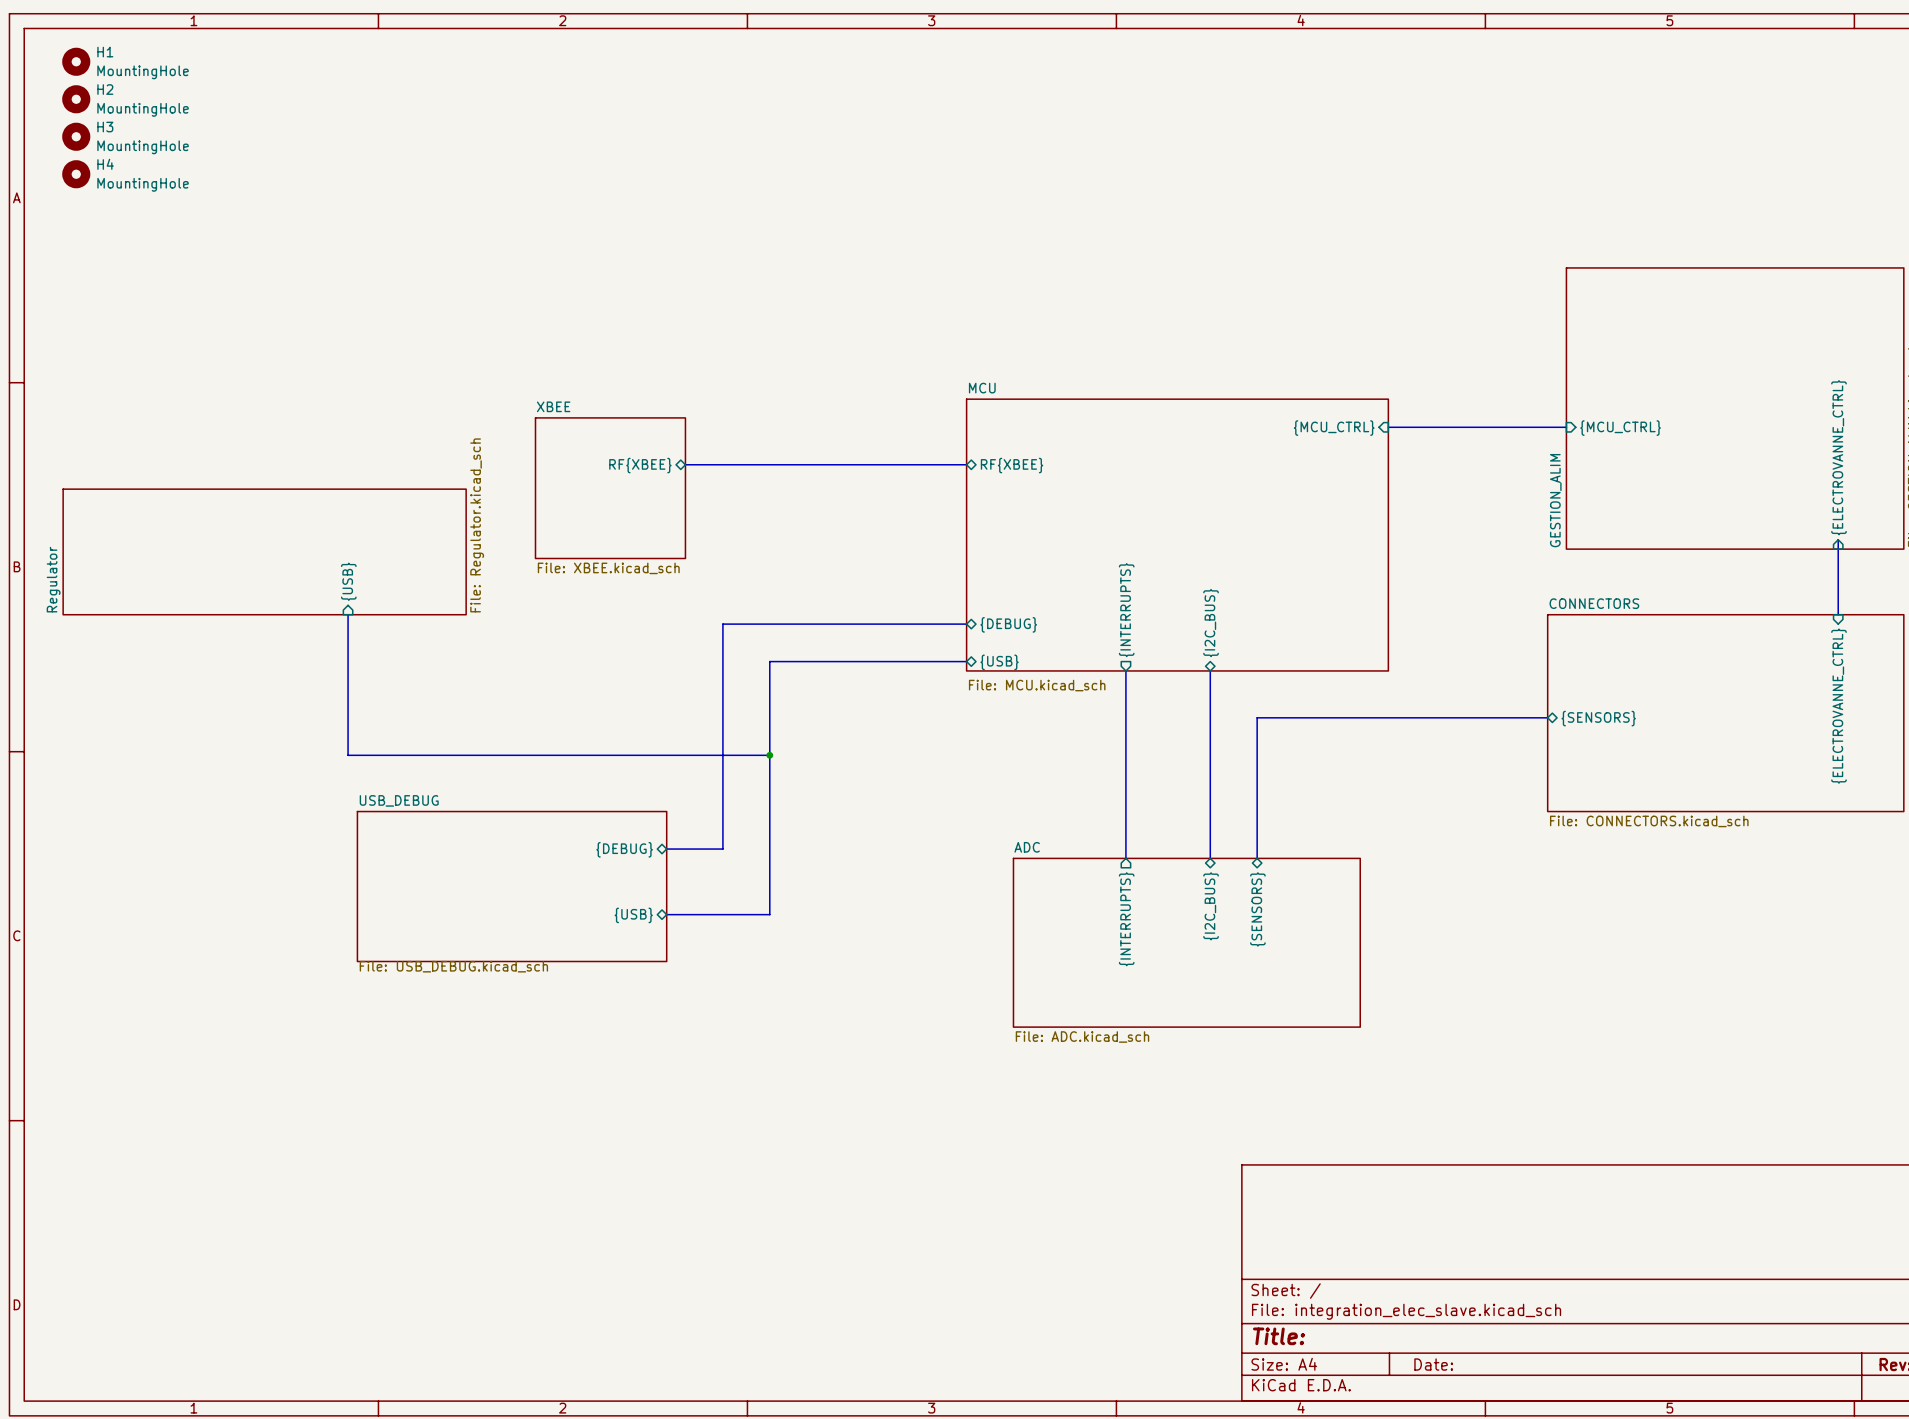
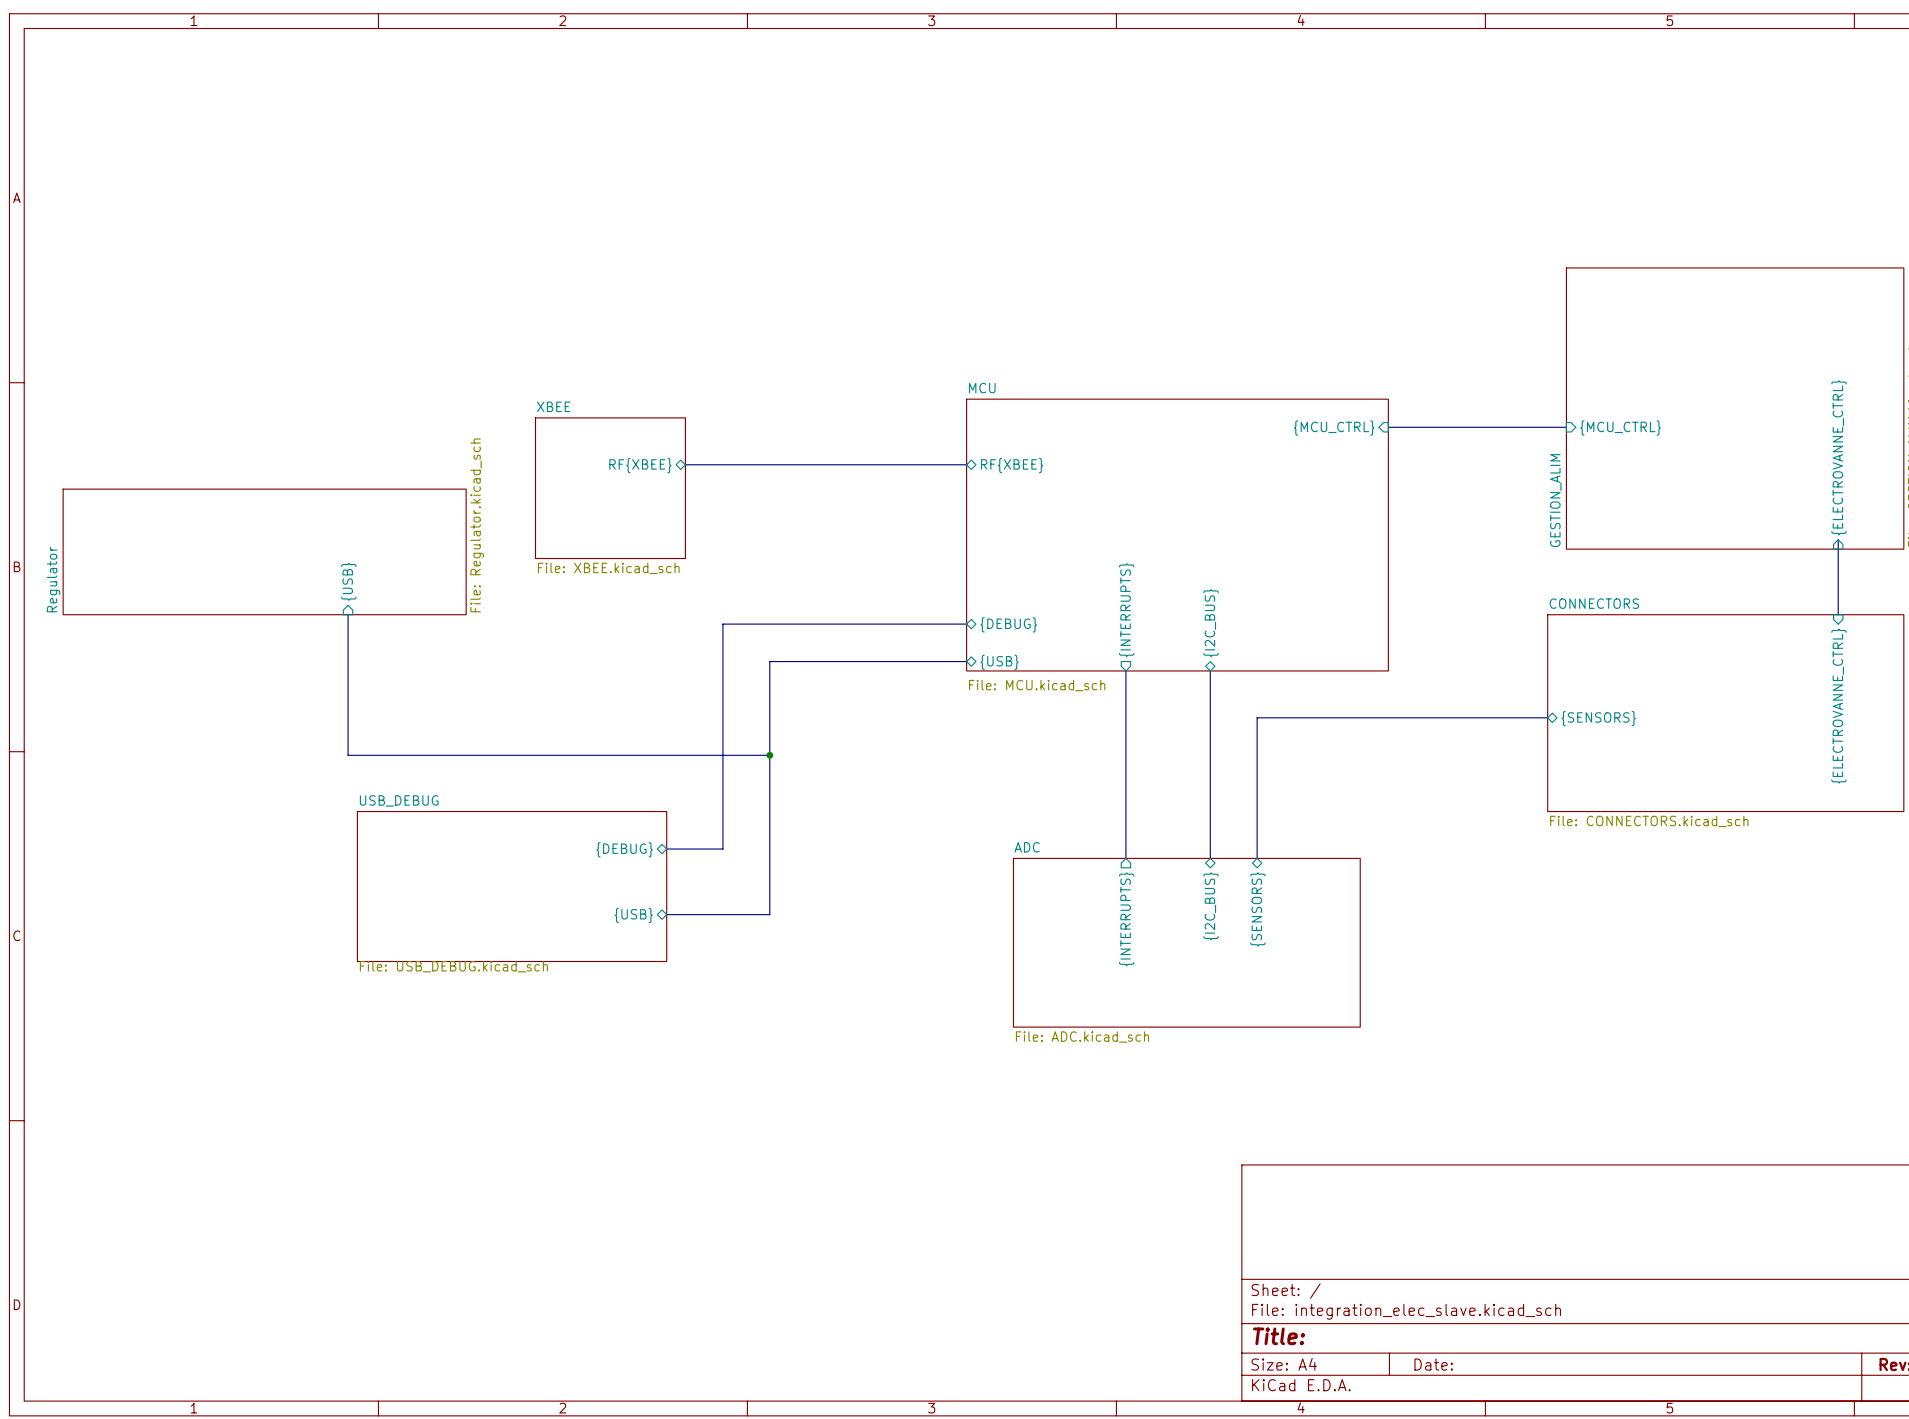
H1: MountingHole (76, 61) -> none
H2: MountingHole (76, 99) -> none
H3: MountingHole (76, 136) -> none
H4: MountingHole (76, 174) -> none

